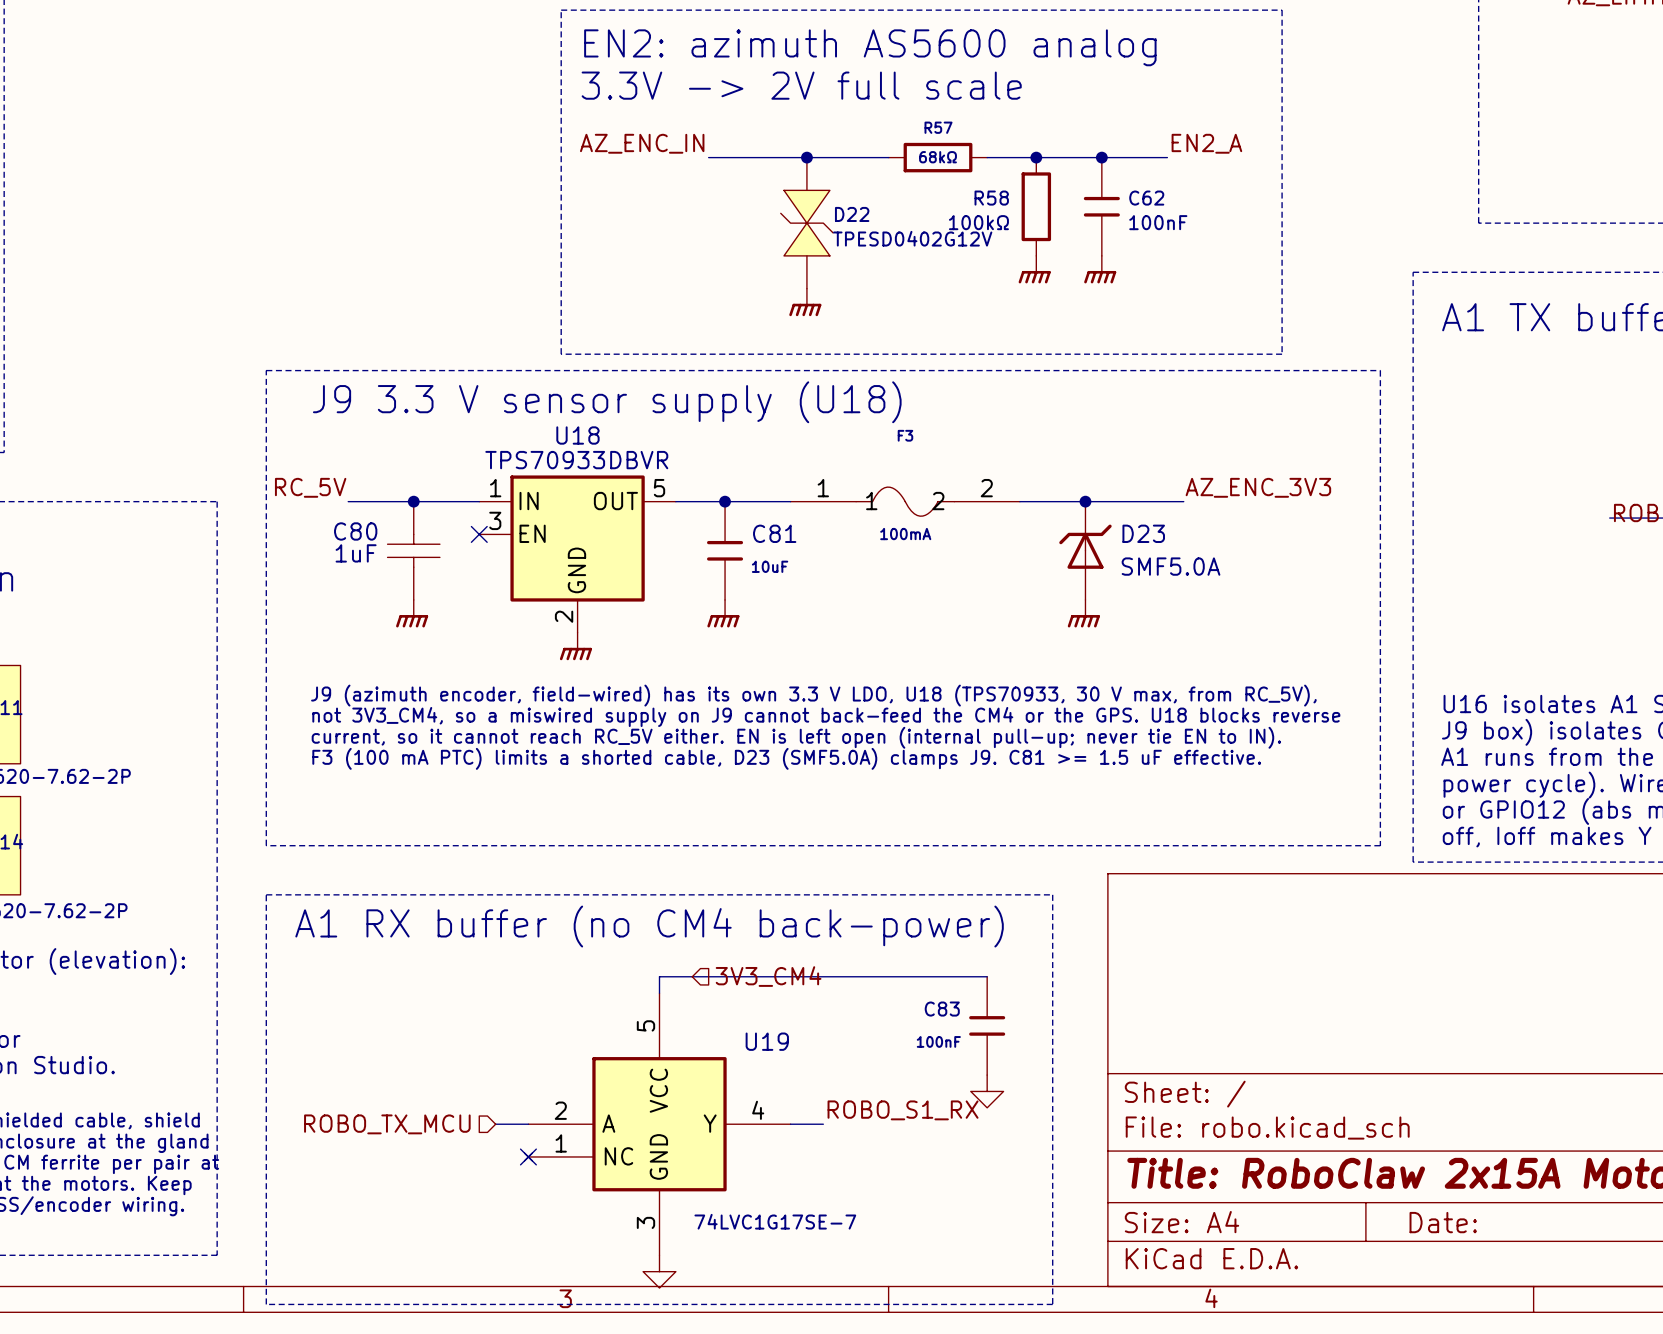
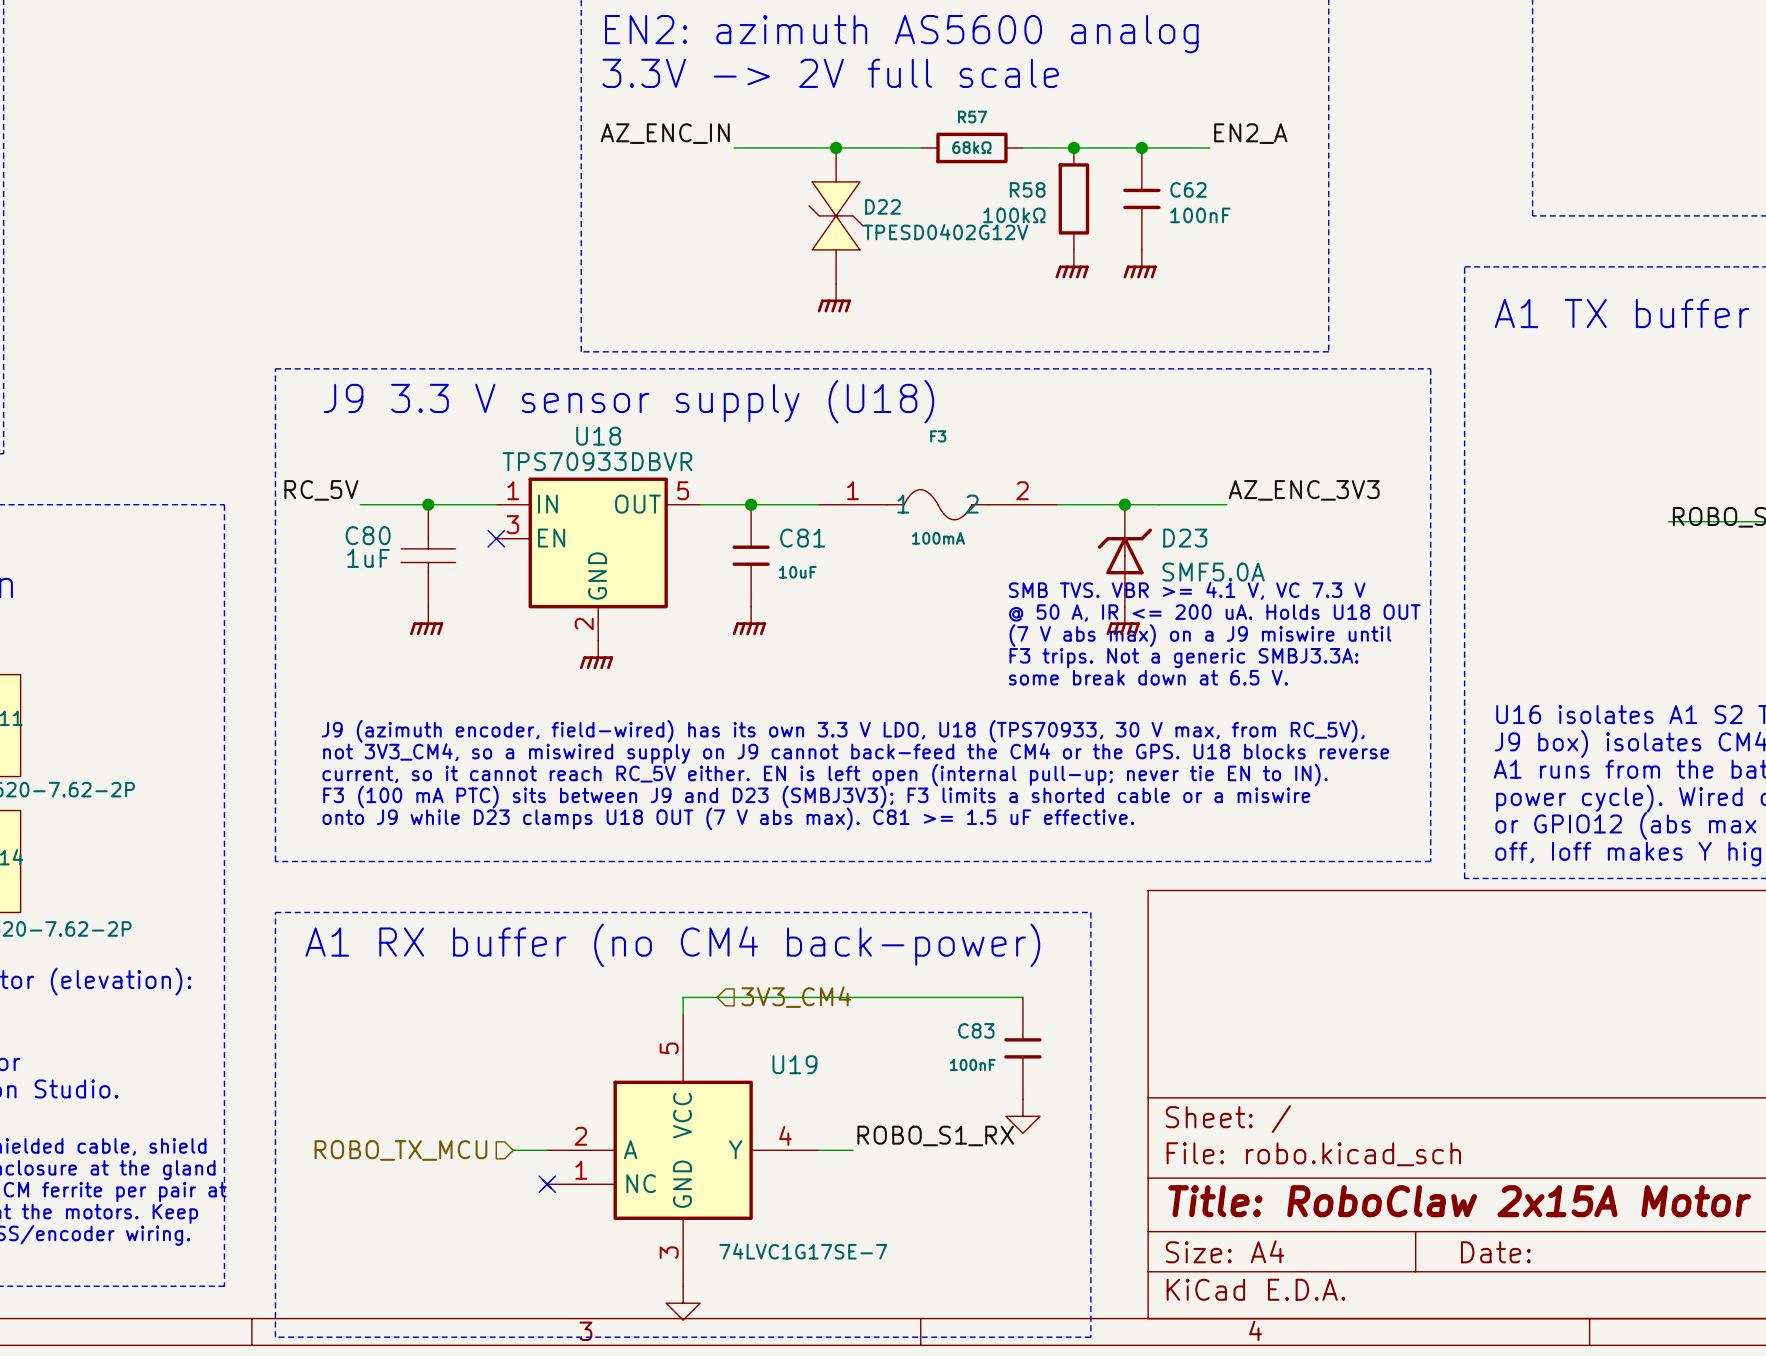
text: none -> SMB TVS. VBR >= 4.1 V, VC 7.3 V (1187, 590)
text: none -> @ 50 A, IR <= 200 uA. Holds U18 OUT (1214, 613)
text: none -> (7 V abs max) on a J9 miswire until (1200, 635)
text: none -> F3 trips. Not a generic SMBJ3.3A: (1183, 658)
text: none -> some break down at 6.5 V. (1148, 677)
text position: J9 (azimuth encoder, field-wired) has its own 3.3 V LDO, U18 (TPS70933, 30 V max, from RC_5V), (813, 695) -> J9 (azimuth encoder, field-wired) has its own 3.3 V LDO, U18 (TPS70933, 30 V max, from RC_5V), (843, 731)
text position: not 3V3_CM4, so a miswired supply on J9 cannot back-feed the CM4 or the GPS. U18 blocks reverse (826, 716) -> not 3V3_CM4, so a miswired supply on J9 cannot back-feed the CM4 or the GPS. U18 blocks reverse (856, 753)
text position: current, so it cannot reach RC_5V either. EN is left open (internal pull-up; never tie EN to IN). (796, 737) -> current, so it cannot reach RC_5V either. EN is left open (internal pull-up; never tie EN to IN). (825, 775)
text: F3 (100 mA PTC) limits a shorted cable, D23 (SMF5.0A) clamps J9. C81 >= 1.5 uF effective. (786, 758) -> none
text: none -> F3 (100 mA PTC) sits between J9 and D23 (SMBJ3V3); F3 limits a shorted cable or a miswire (816, 796)
text: none -> onto J9 while D23 clamps U18 OUT (7 V abs max). C81 >= 1.5 uF effective. (728, 818)

